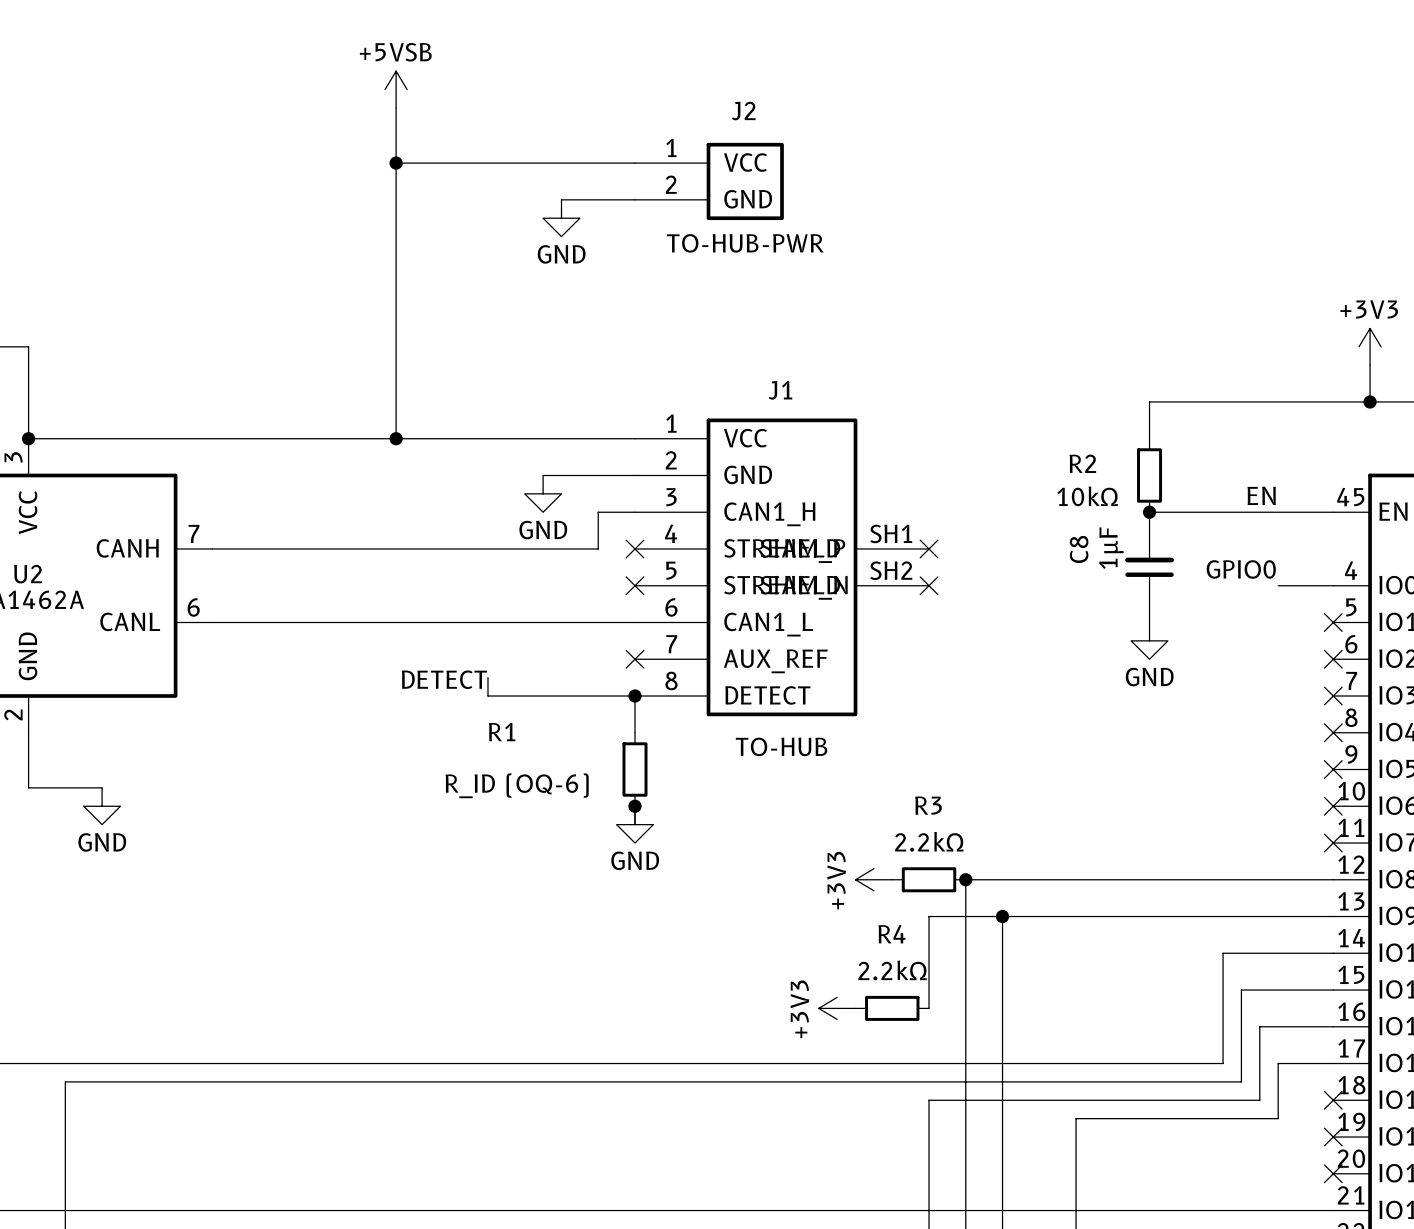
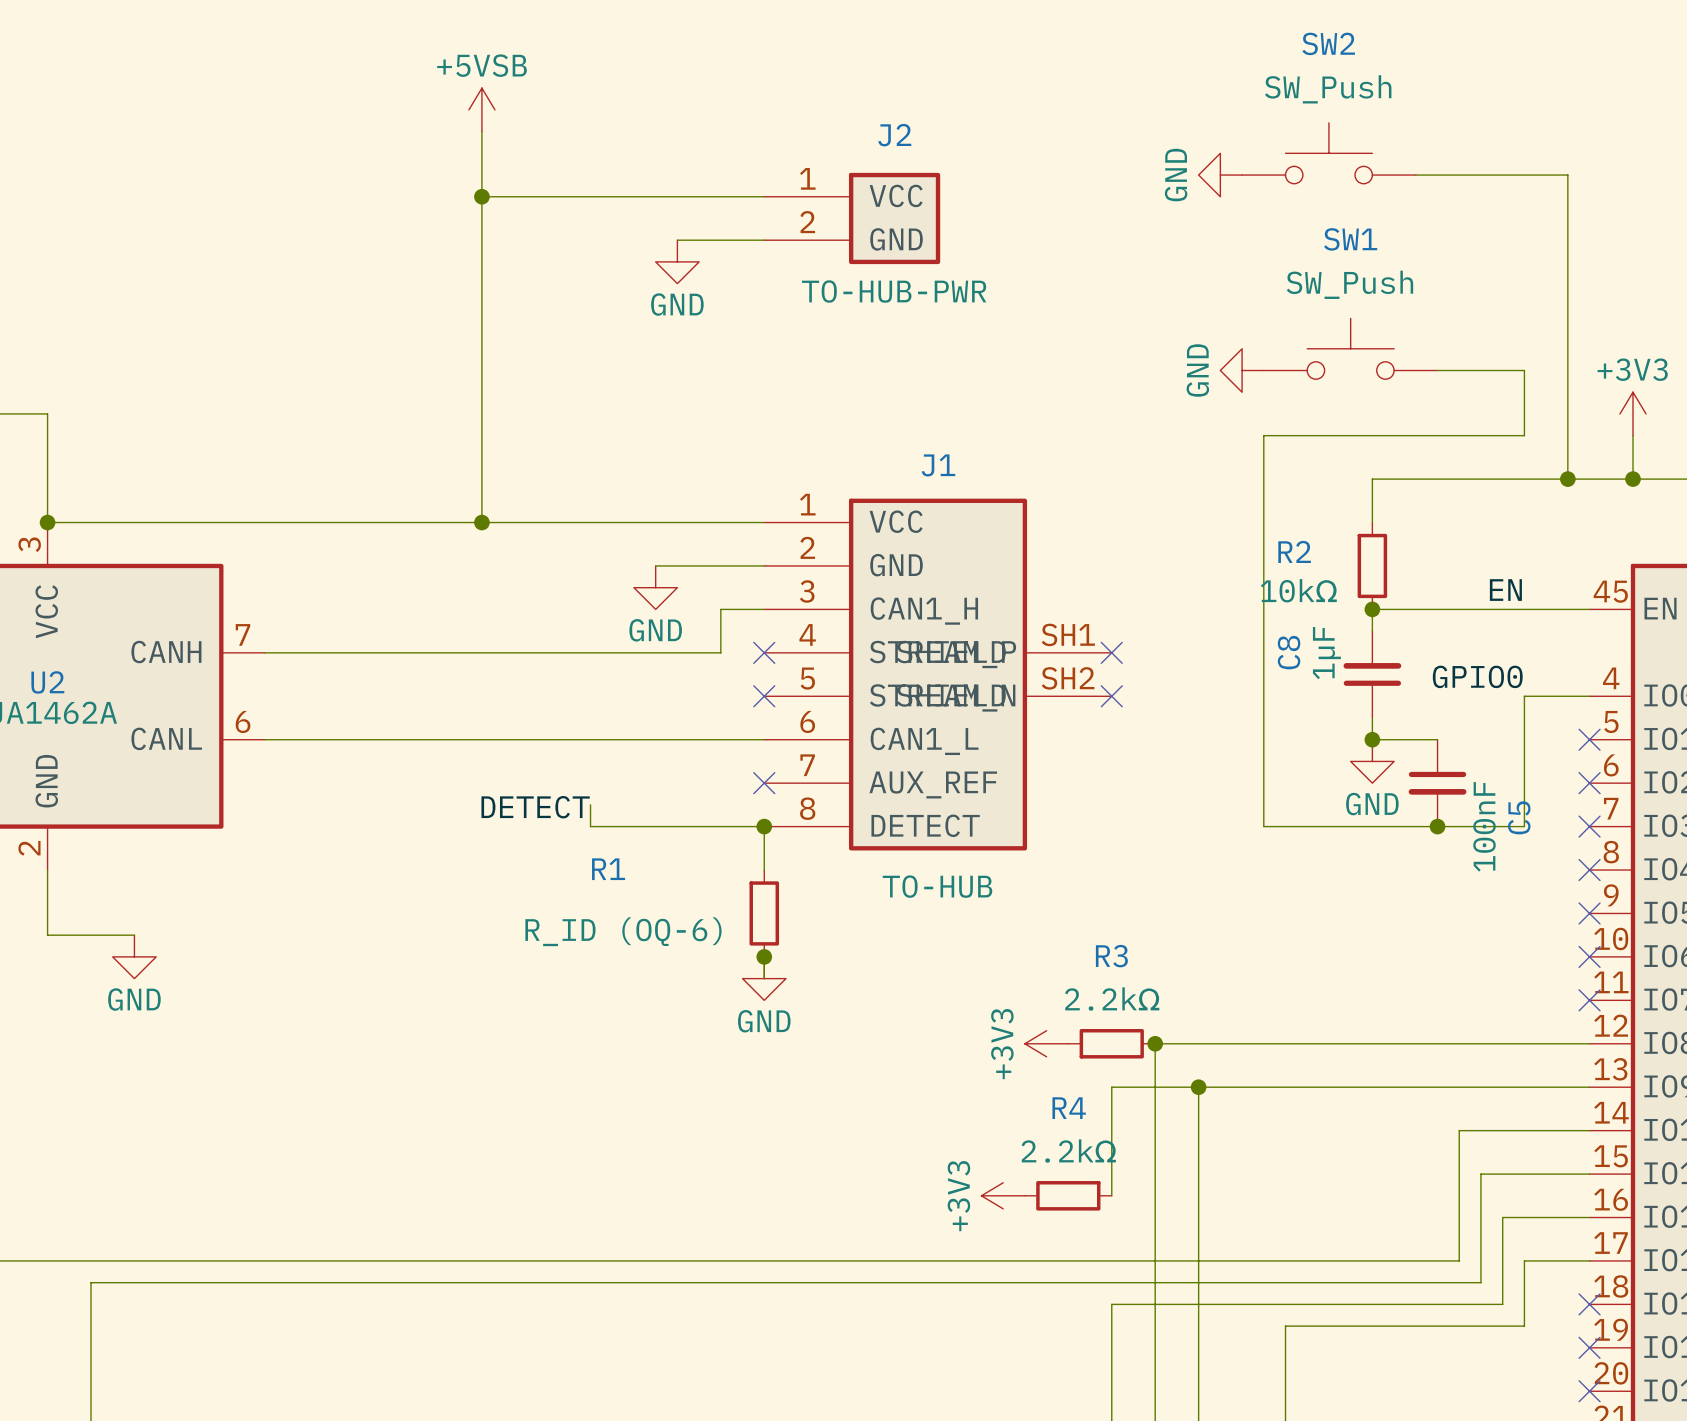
SW2: none -> SW_Push (1328, 153)
power symbol: none -> GND (1220, 175)
wire: none -> (1415, 175) (1567, 175) (1567, 479)
SW1: none -> SW_Push (1350, 348)
power symbol: none -> GND (1242, 370)
wire: none -> (1437, 370) (1524, 370) (1524, 435) (1263, 435) (1263, 826) (1524, 826) (1524, 696)
junction: none -> (1567, 479)
wire: none -> (1372, 739) (1437, 739)
junction: none -> (1372, 739)
C5: none -> 100nF (1437, 783)
junction: none -> (1437, 826)

